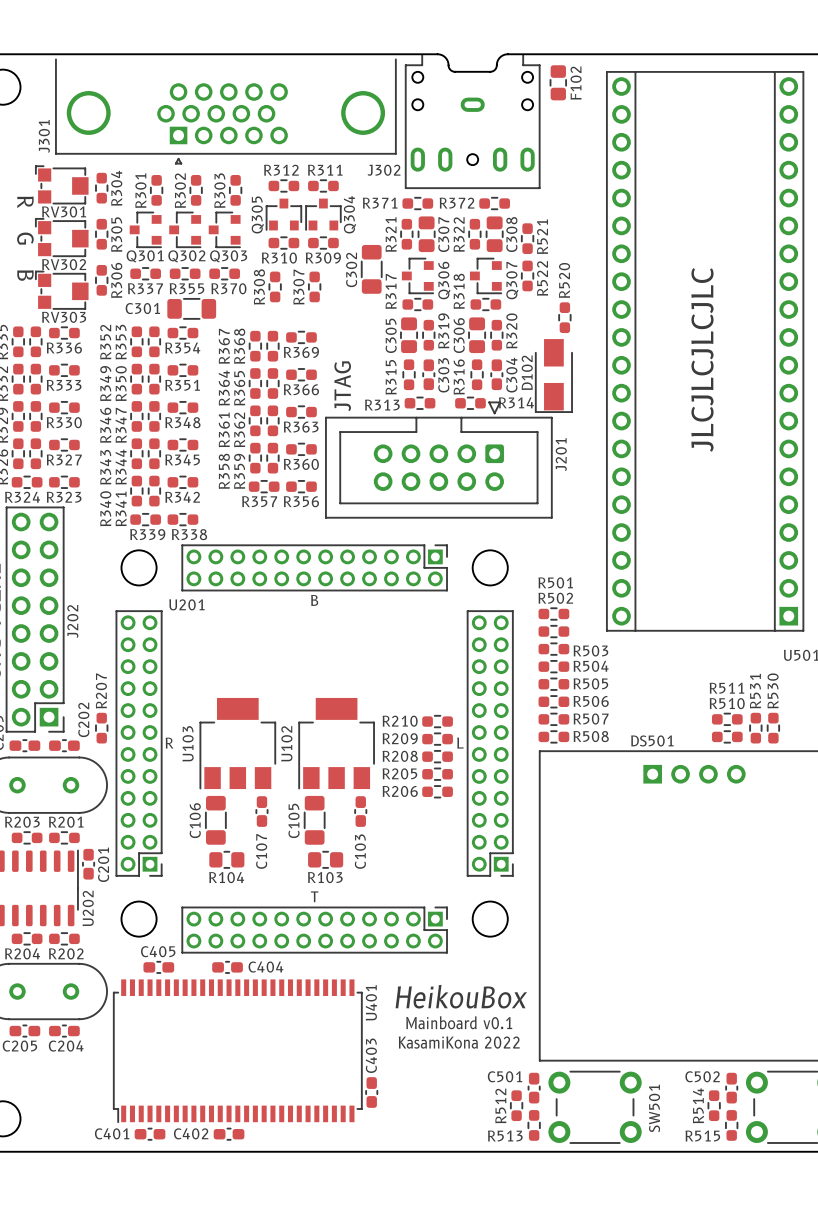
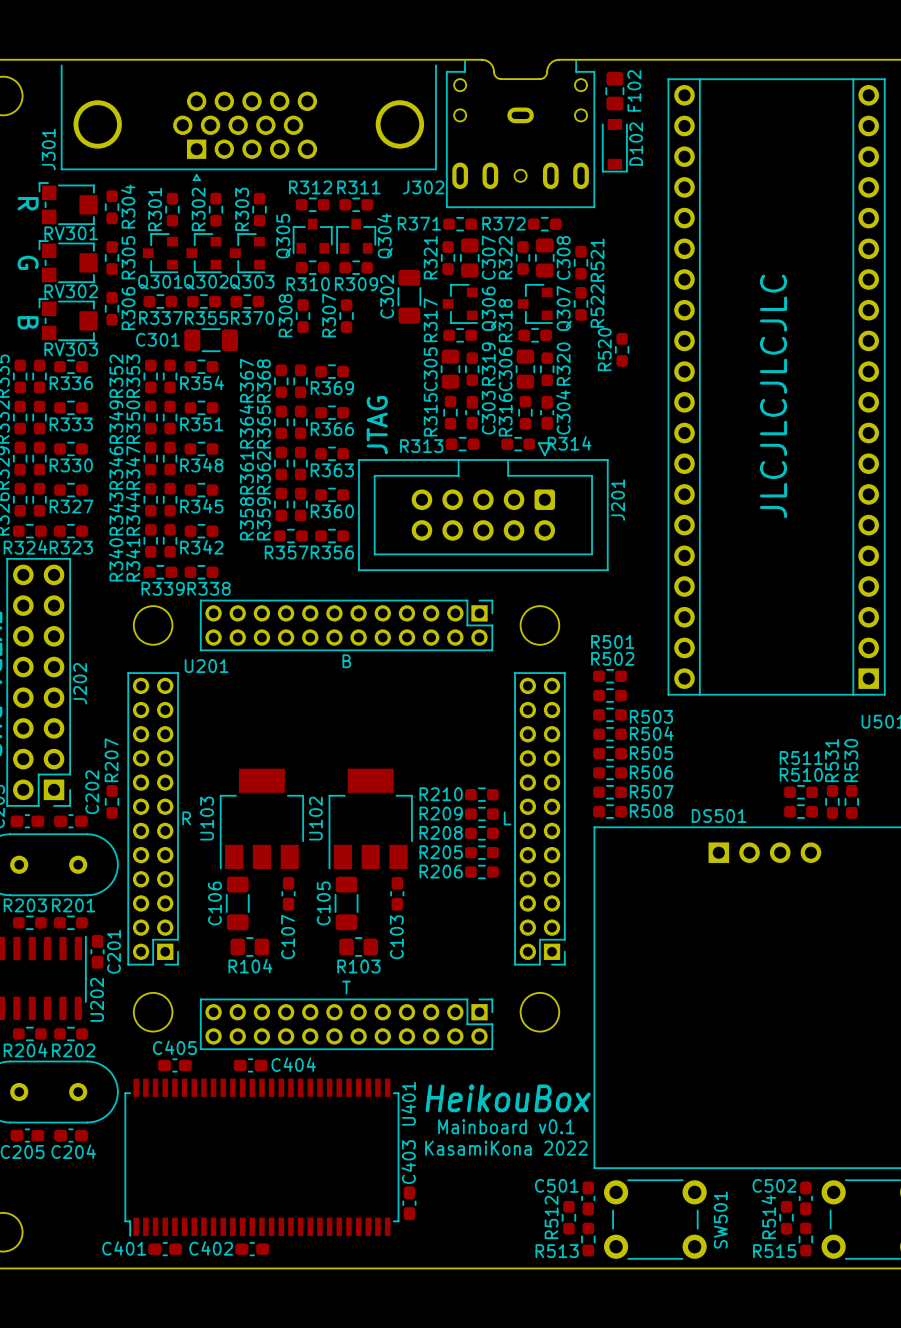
R520 name position: R520 (564, 280) -> R520 (604, 349)
D102 footprint: [535, 339, 573, 413] -> [602, 118, 628, 173]
D102 name position: D102 (527, 372) -> D102 (636, 144)

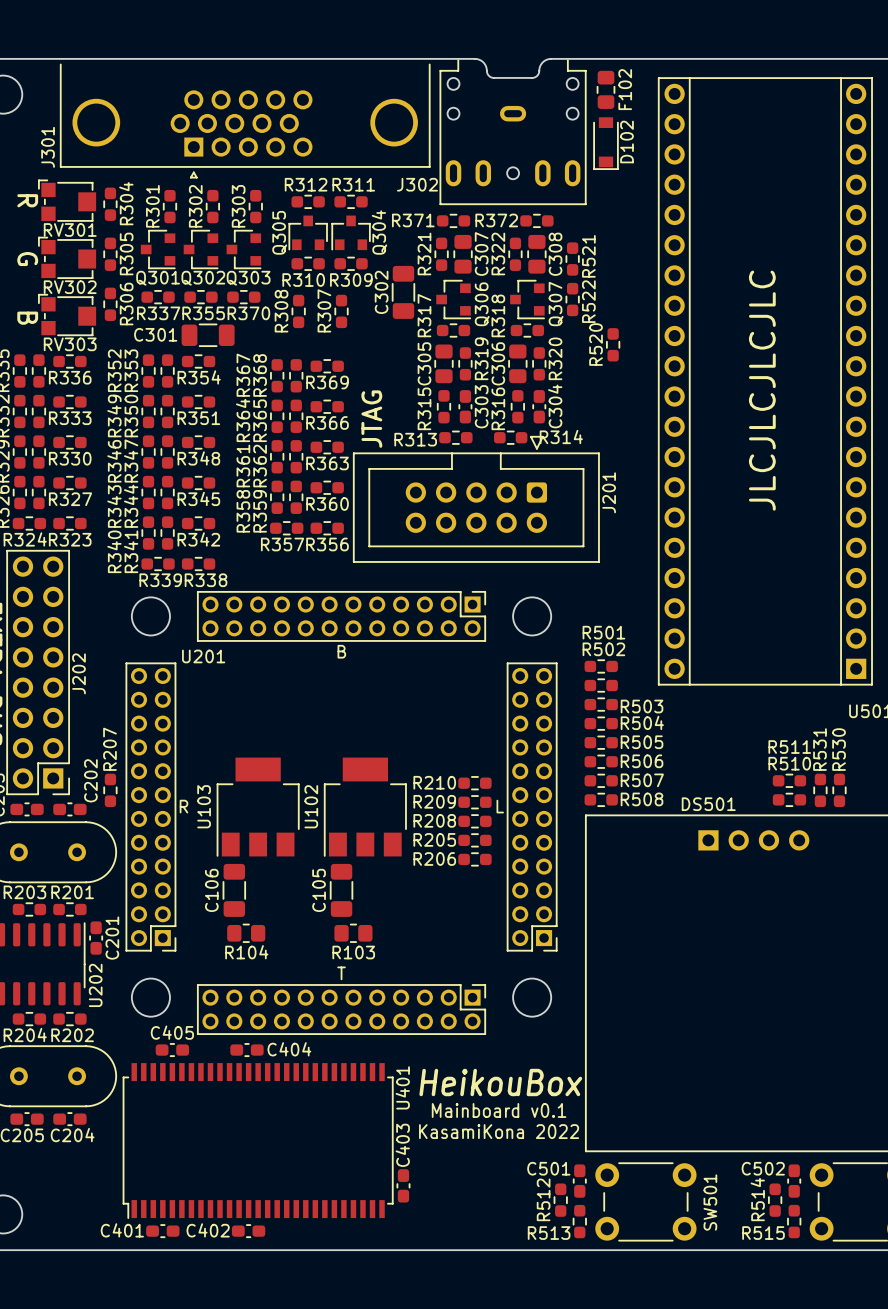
C107: (288, 893) -> none
C103: (397, 893) -> none

